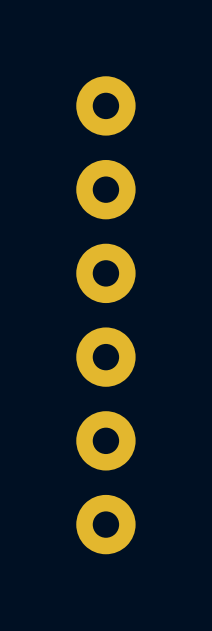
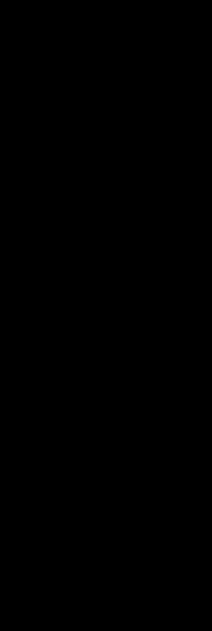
part: (105, 315) -> none

